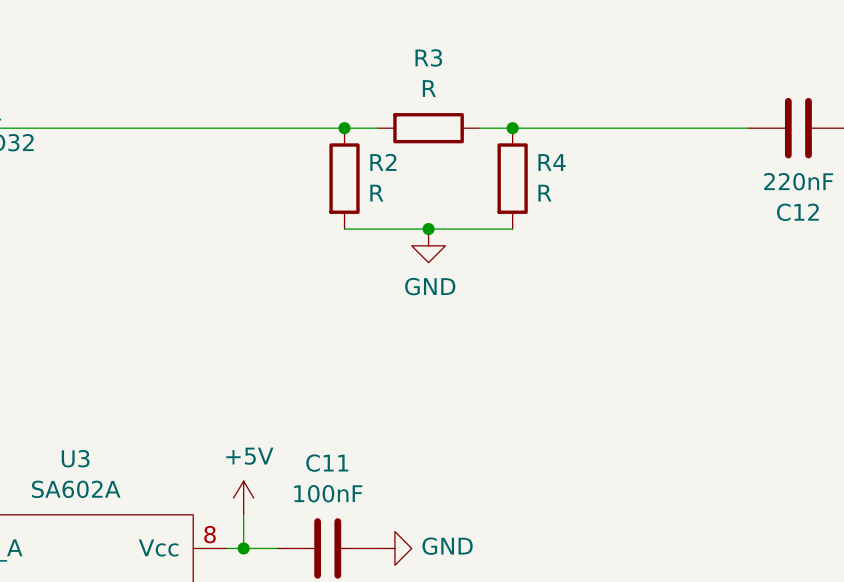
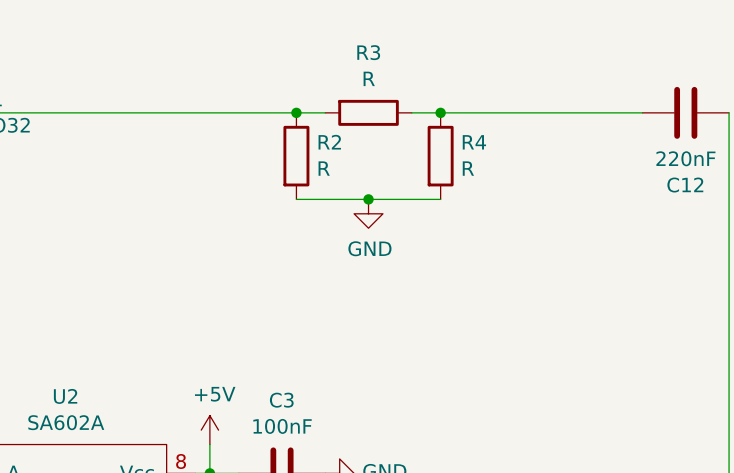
U3 name: U3 (75, 458) -> U2 (65, 396)
C11 name: C11 (327, 463) -> C3 (281, 400)

